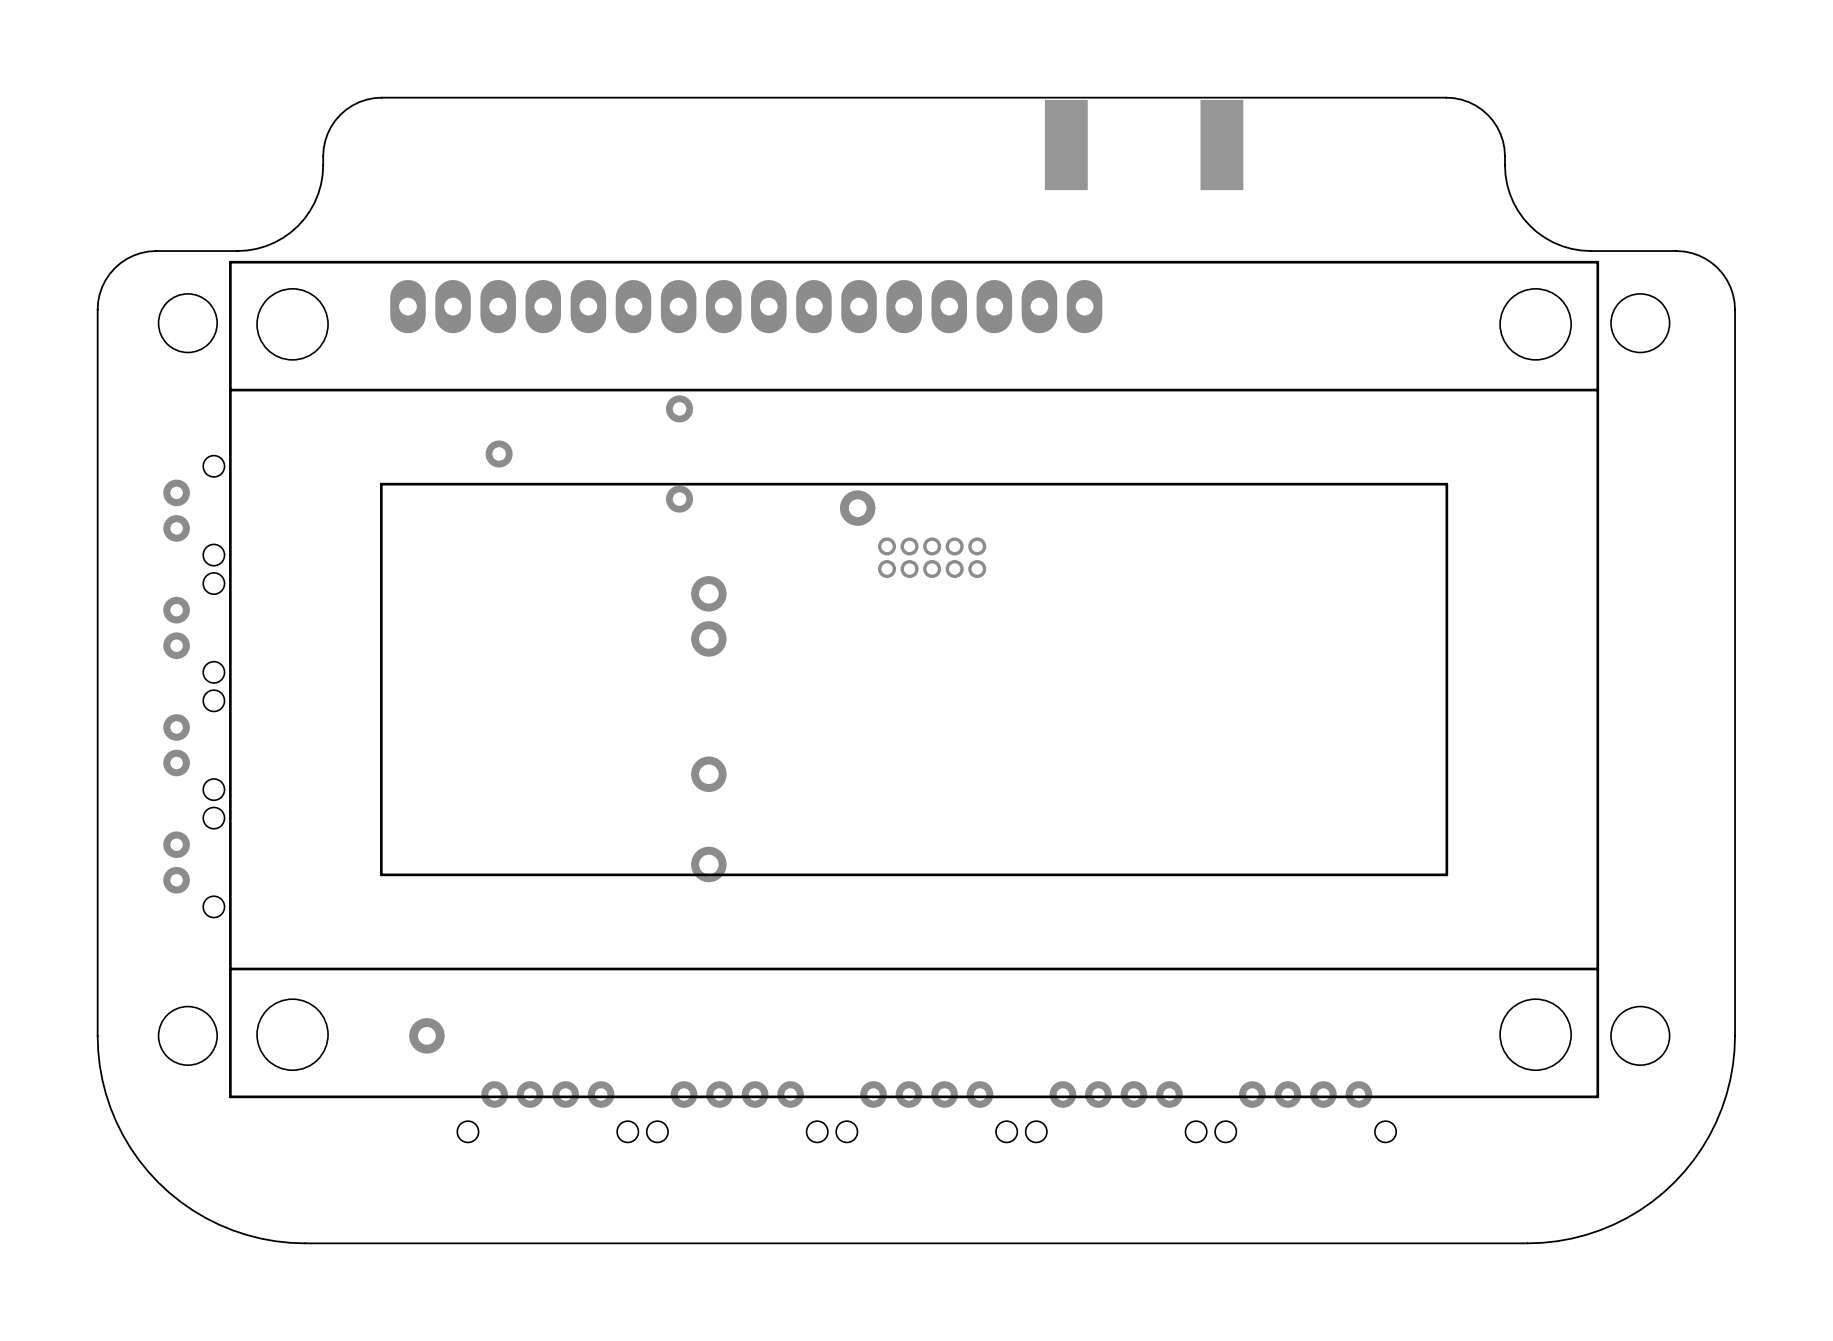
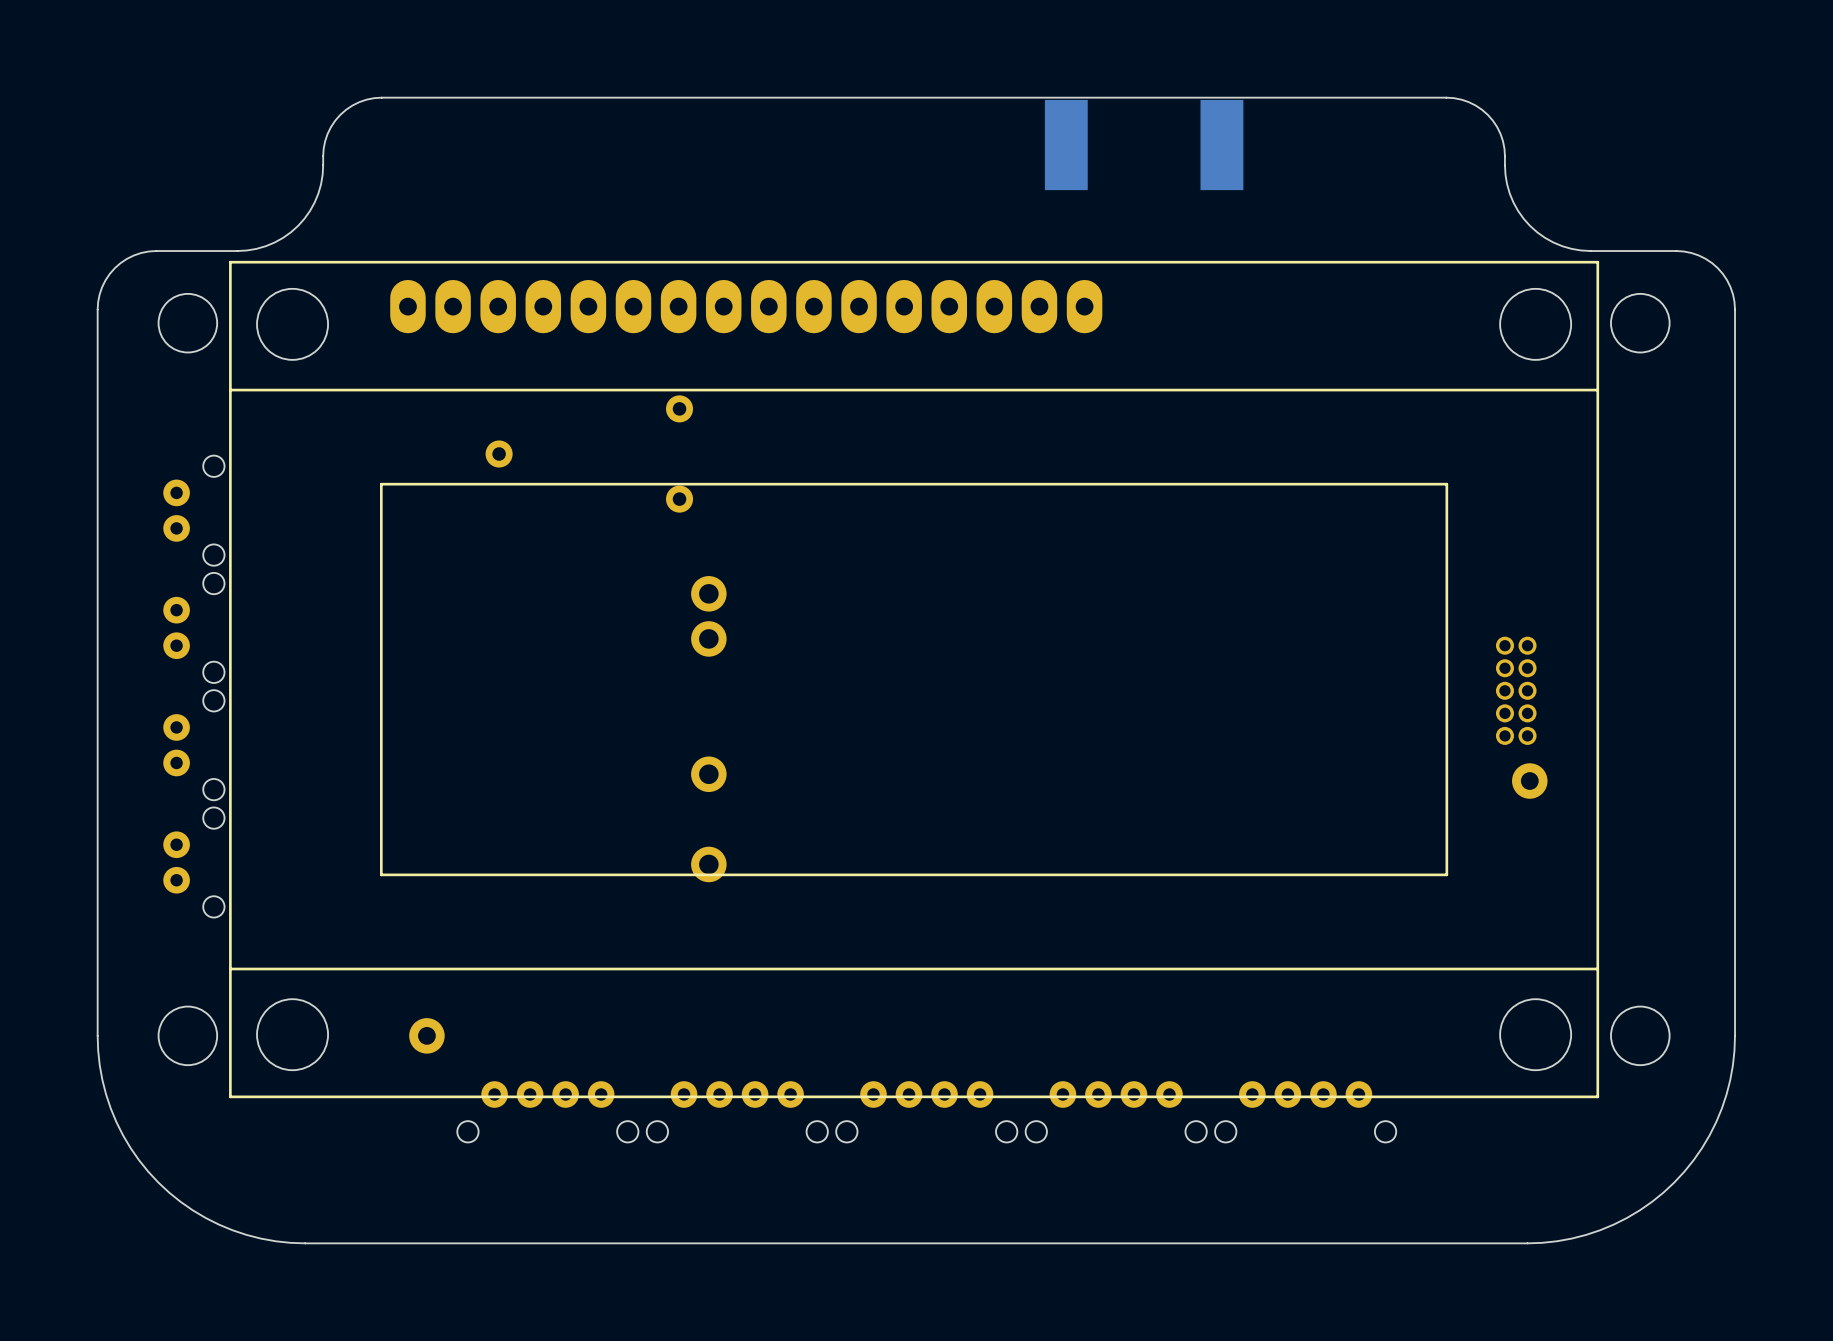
part: (857, 508) -> none
part: (932, 557) -> none
part: none -> (1516, 690)
part: none -> (1529, 781)

